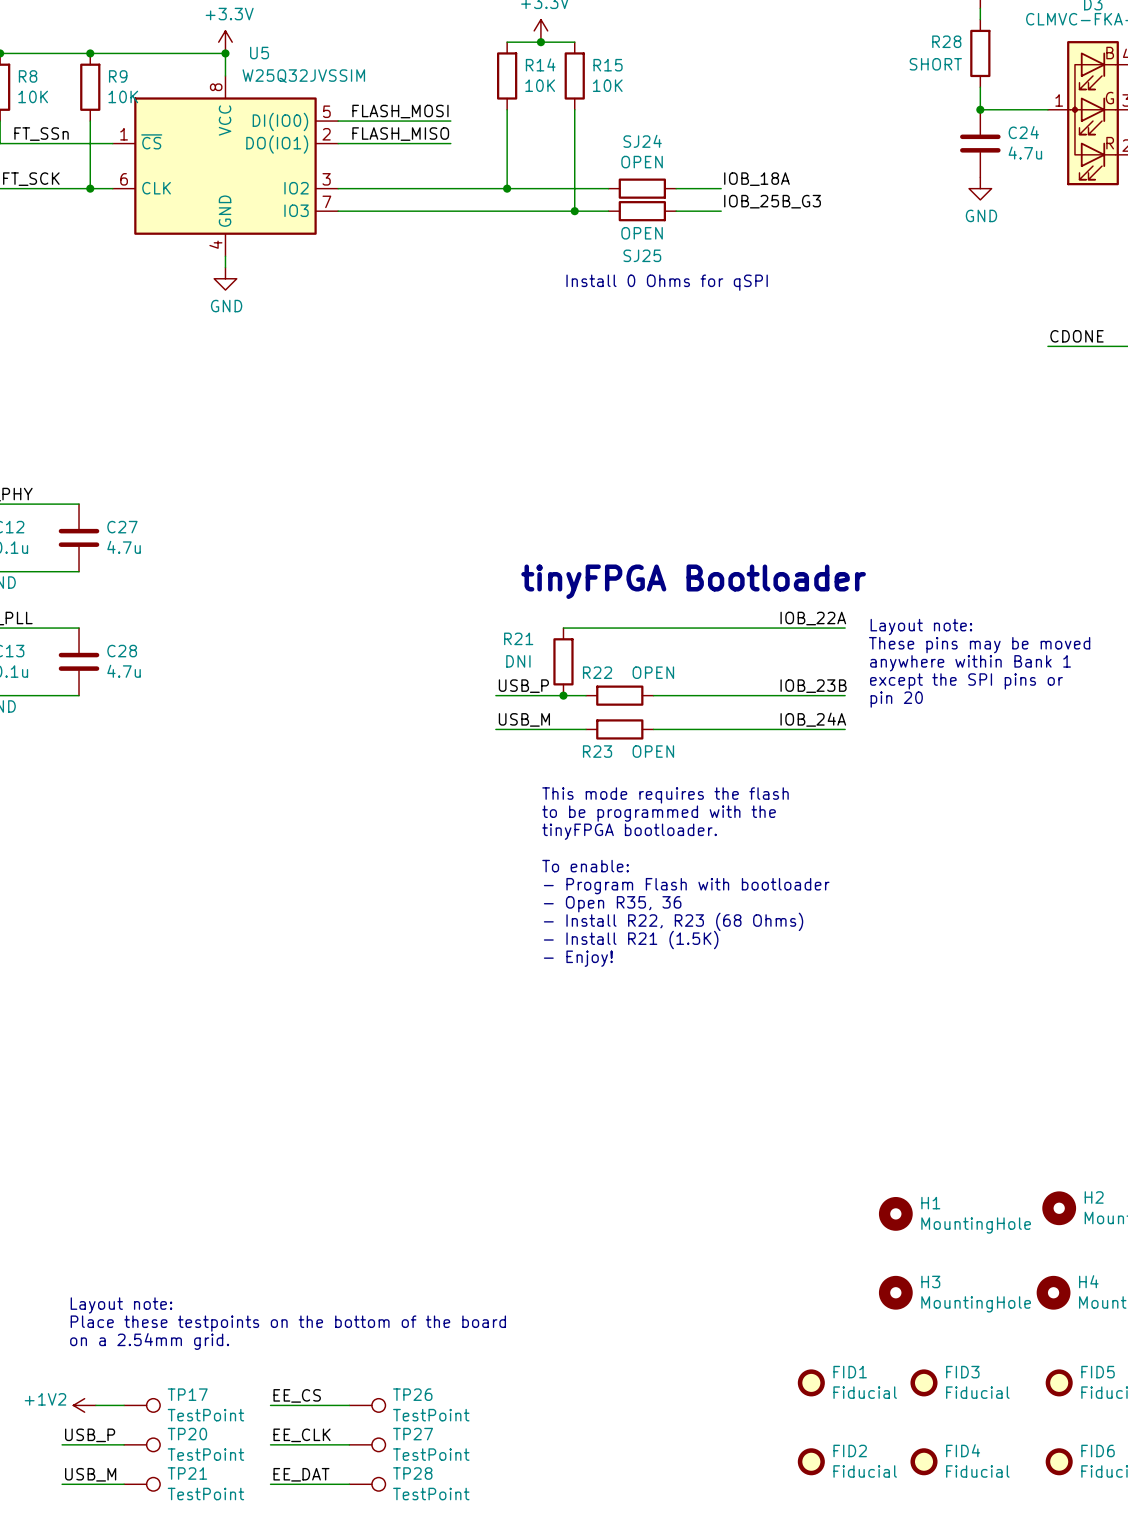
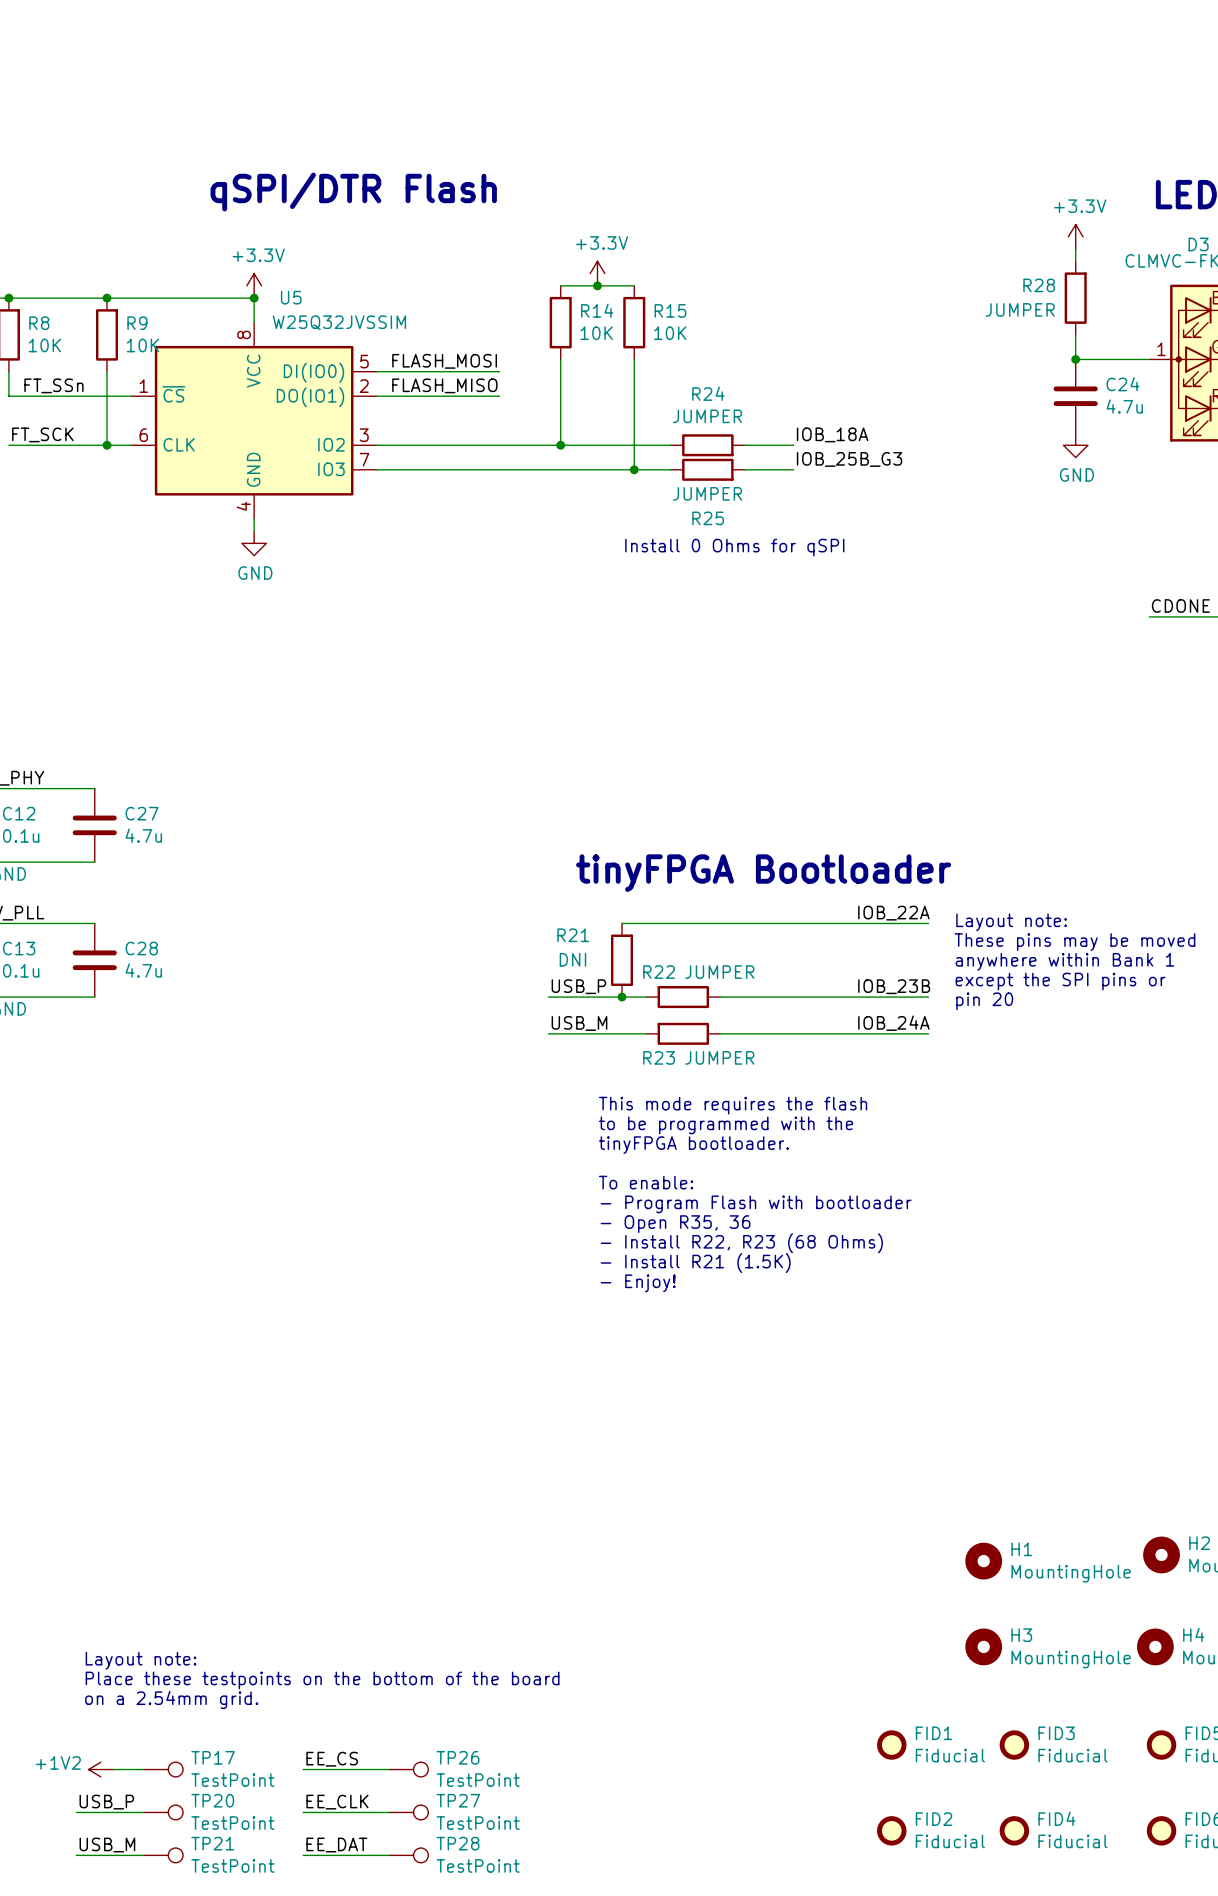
R28 value: SHORT (935, 64) -> JUMPER (1020, 309)
SJ24 name: SJ24 (642, 141) -> R24 (708, 393)
SJ24 value: OPEN (642, 162) -> JUMPER (707, 416)
SJ25 value: OPEN (642, 233) -> JUMPER (707, 493)
SJ25 name: SJ25 (642, 255) -> R25 (708, 518)
R22 value: OPEN (653, 672) -> JUMPER (719, 972)
R23 value: OPEN (653, 751) -> JUMPER (719, 1057)

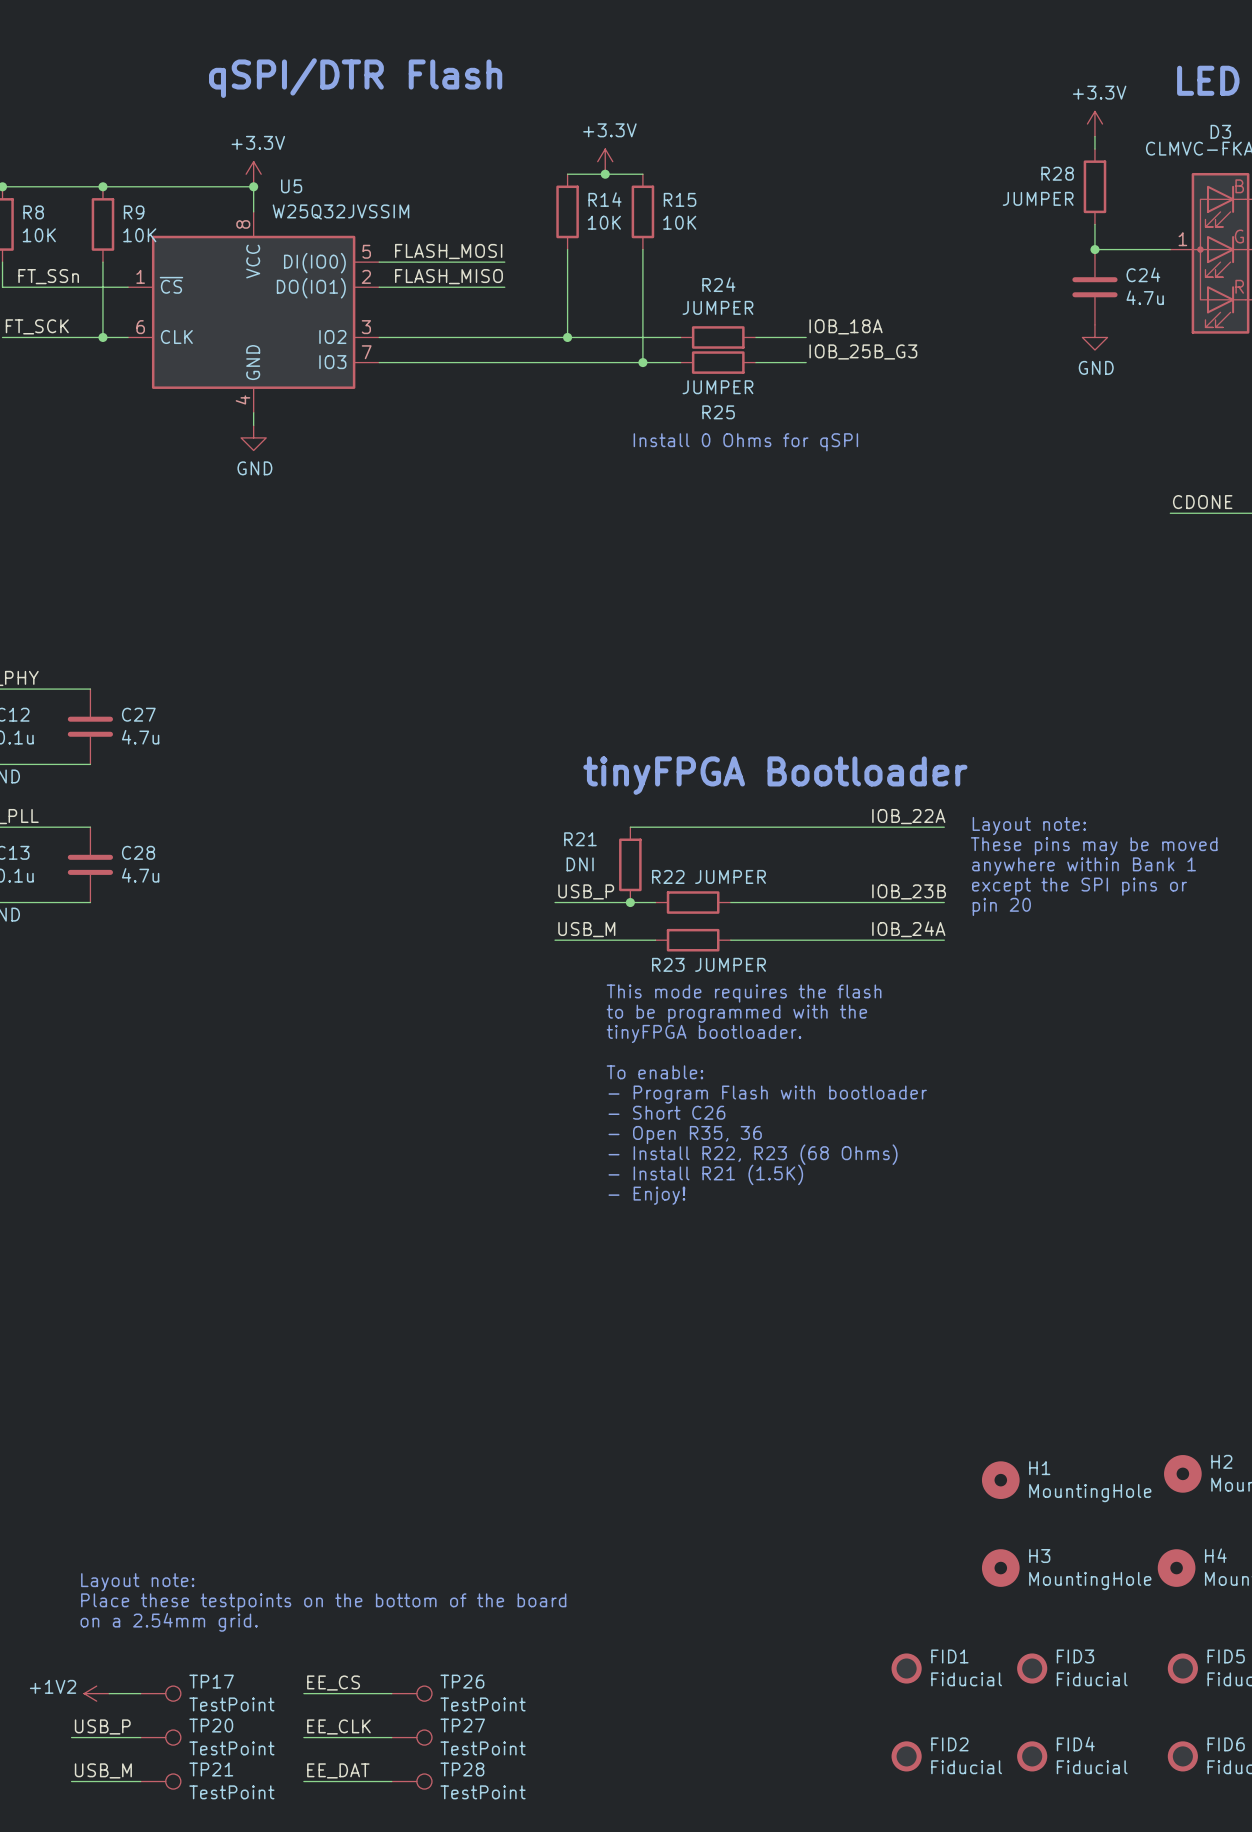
text: none -> This mode requires the flash (744, 993)
text: This mode requires the flash (733, 1105) -> to be programmed with the (736, 1013)
text: to be programmed with the (726, 1125) -> tinyFPGA bootloader. (704, 1033)
text: tinyFPGA bootloader. (693, 1145) -> none
text: none -> To enable: (654, 1072)
text: To enable: (646, 1182) -> - Program Flash with bootloader (767, 1094)
text: - Program Flash with bootloader (756, 1204) -> - Short C26 (666, 1112)

